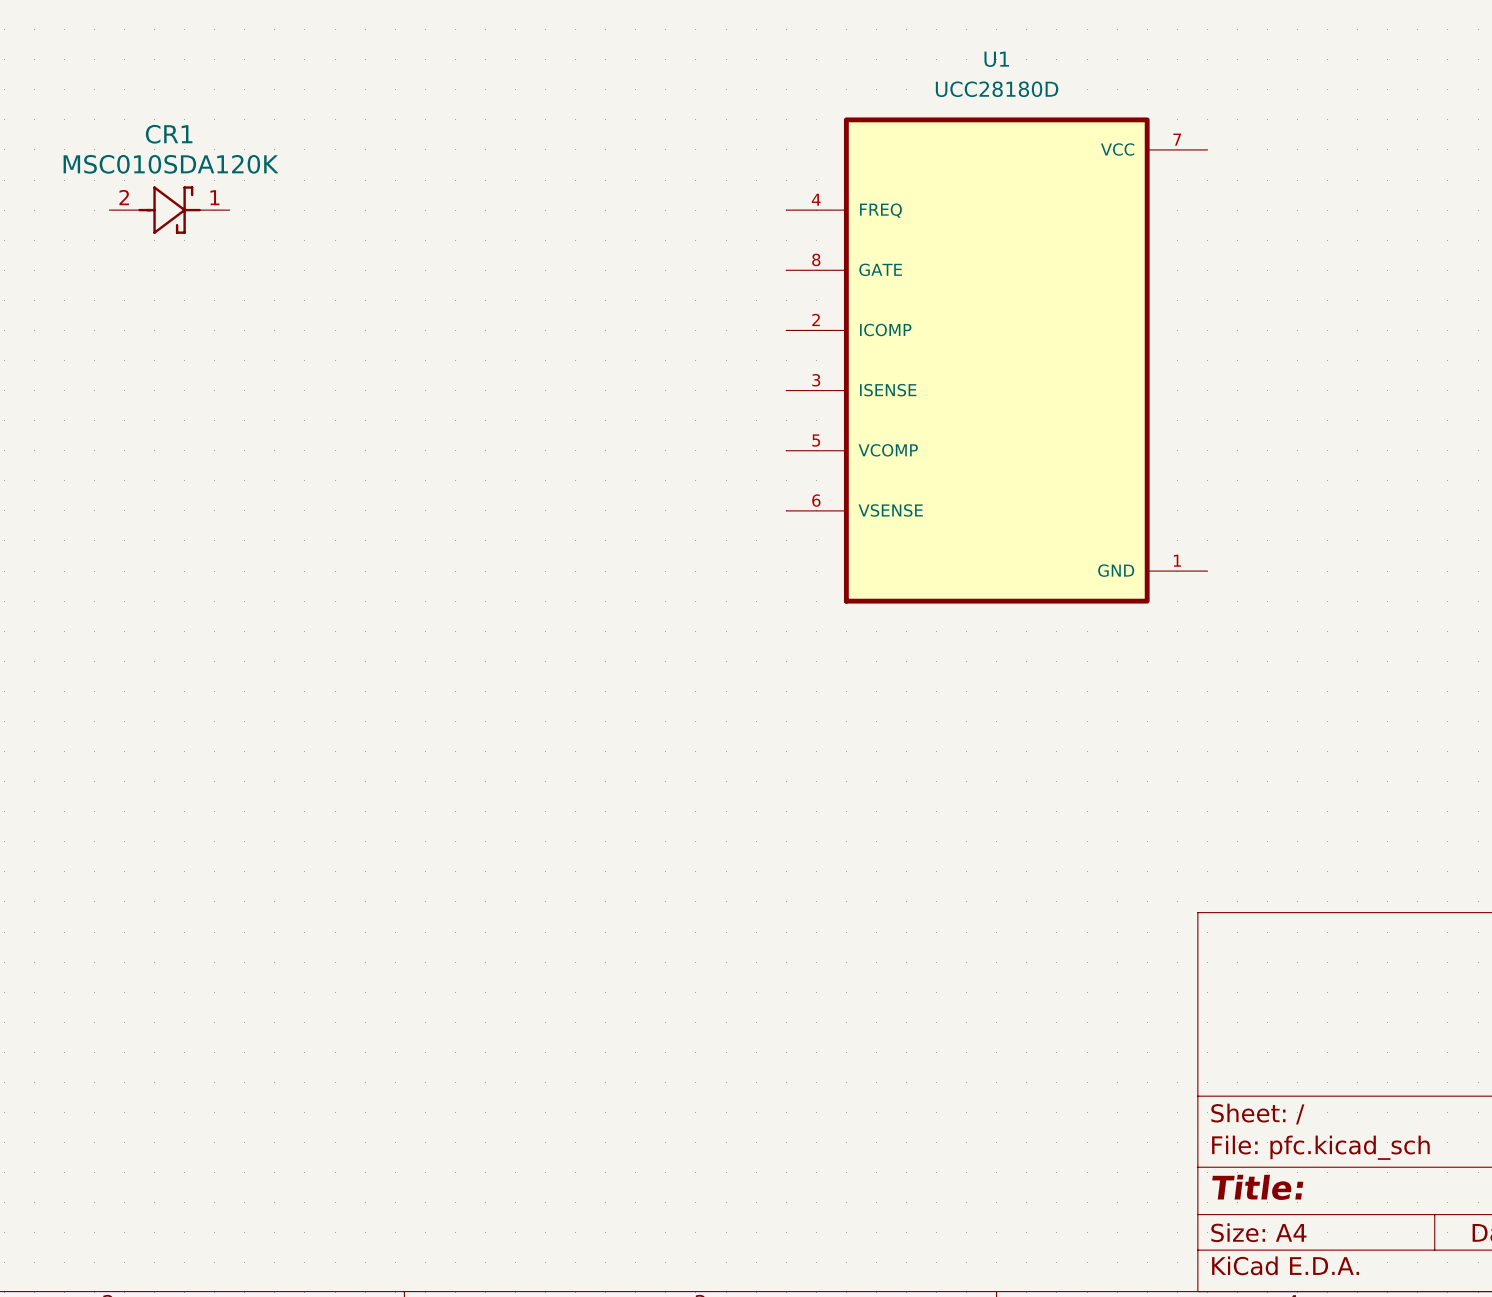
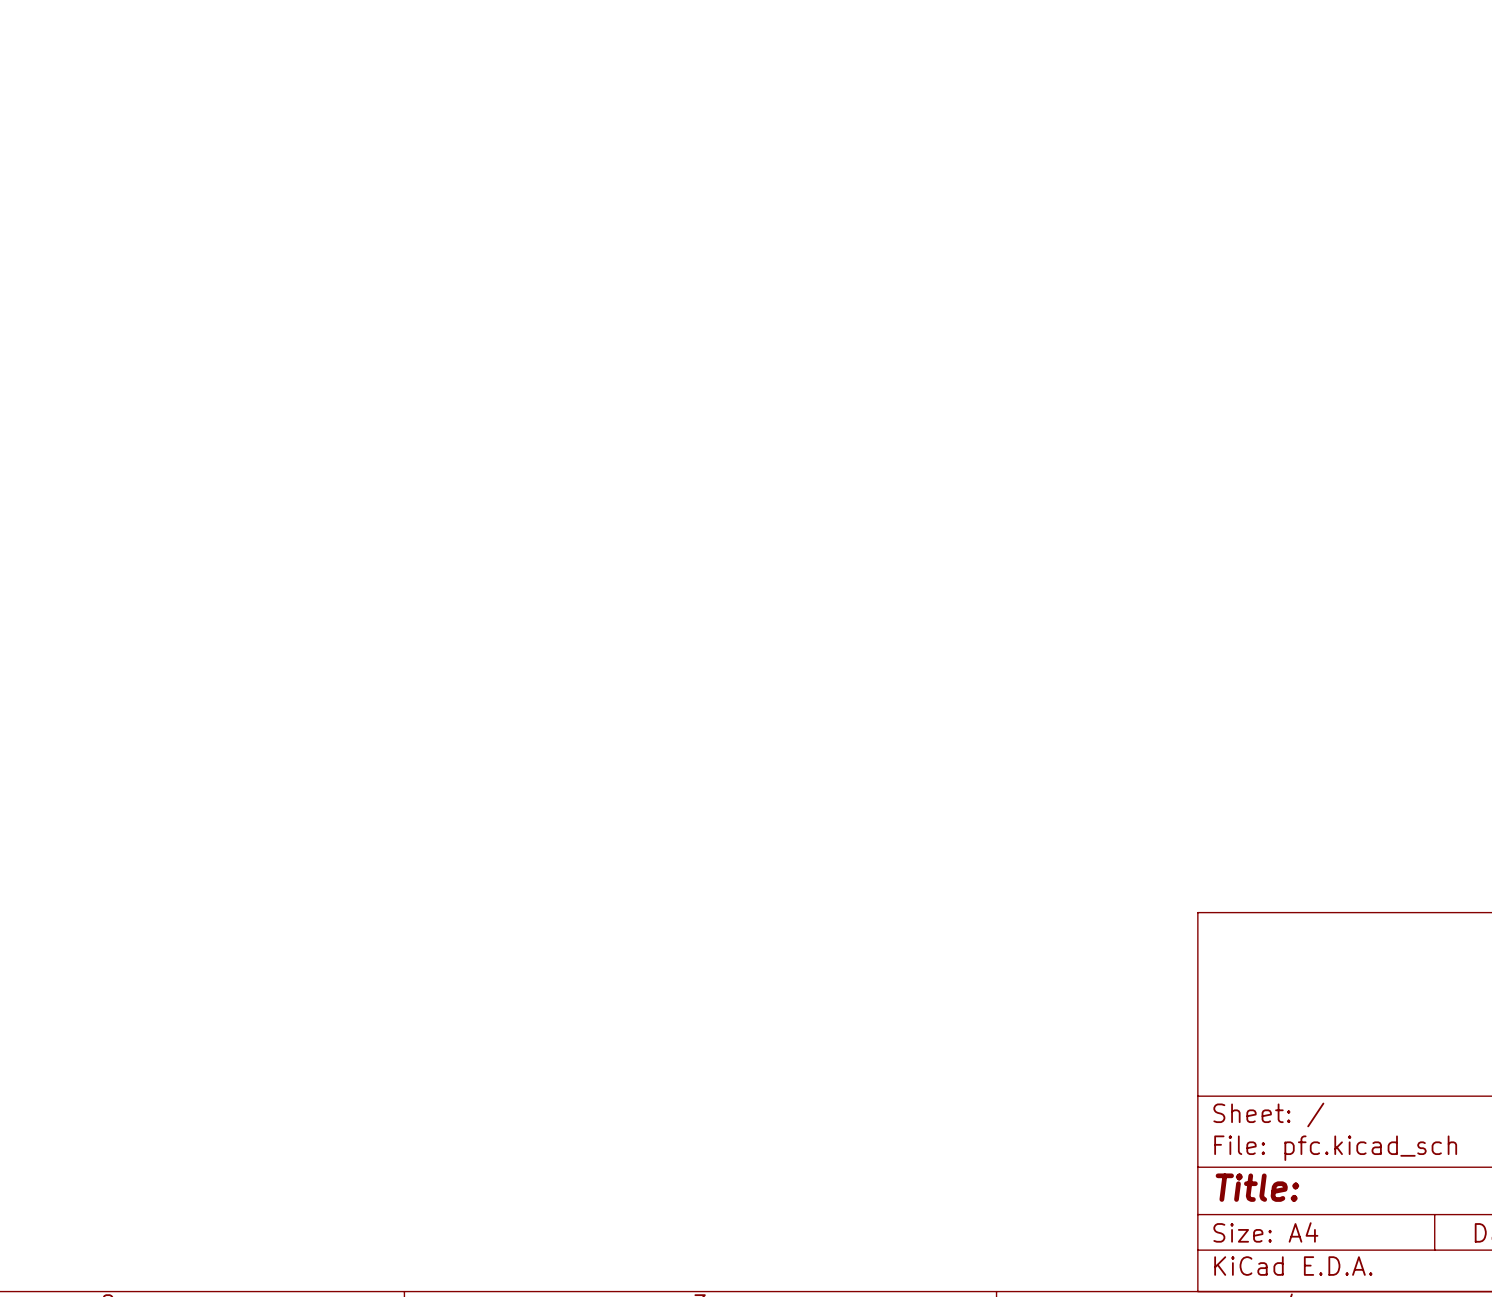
CR1: MSC010SDA120K (169, 210) -> none
U1: UCC28180D (996, 360) -> none

